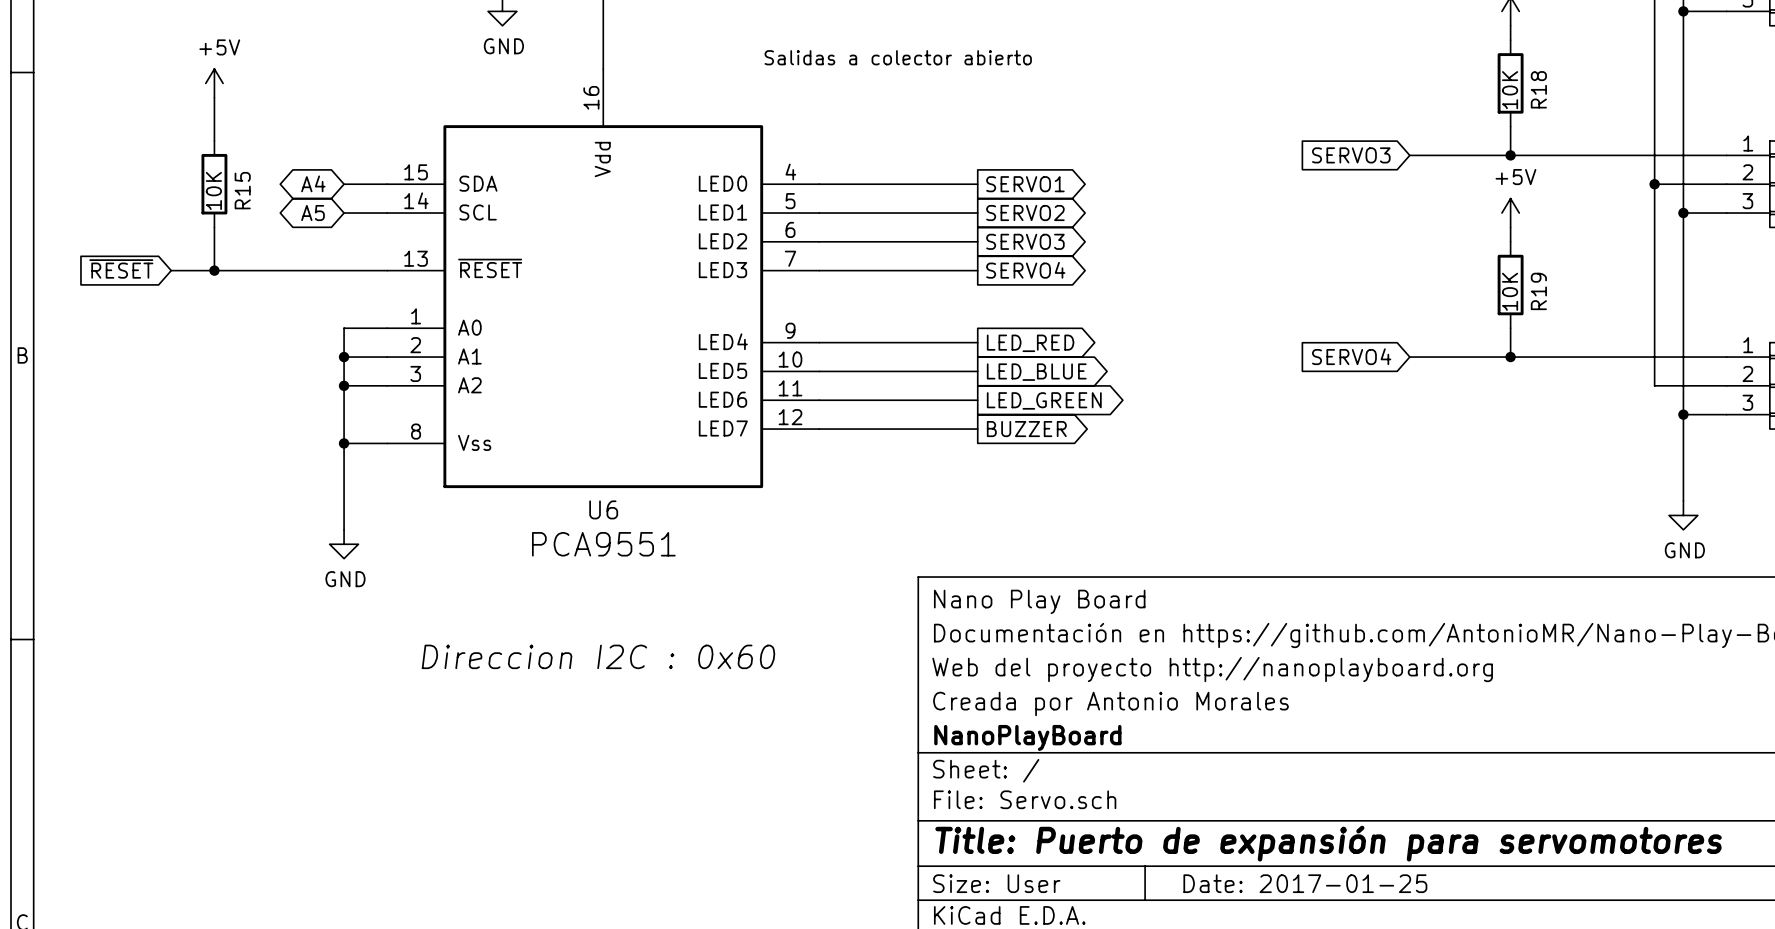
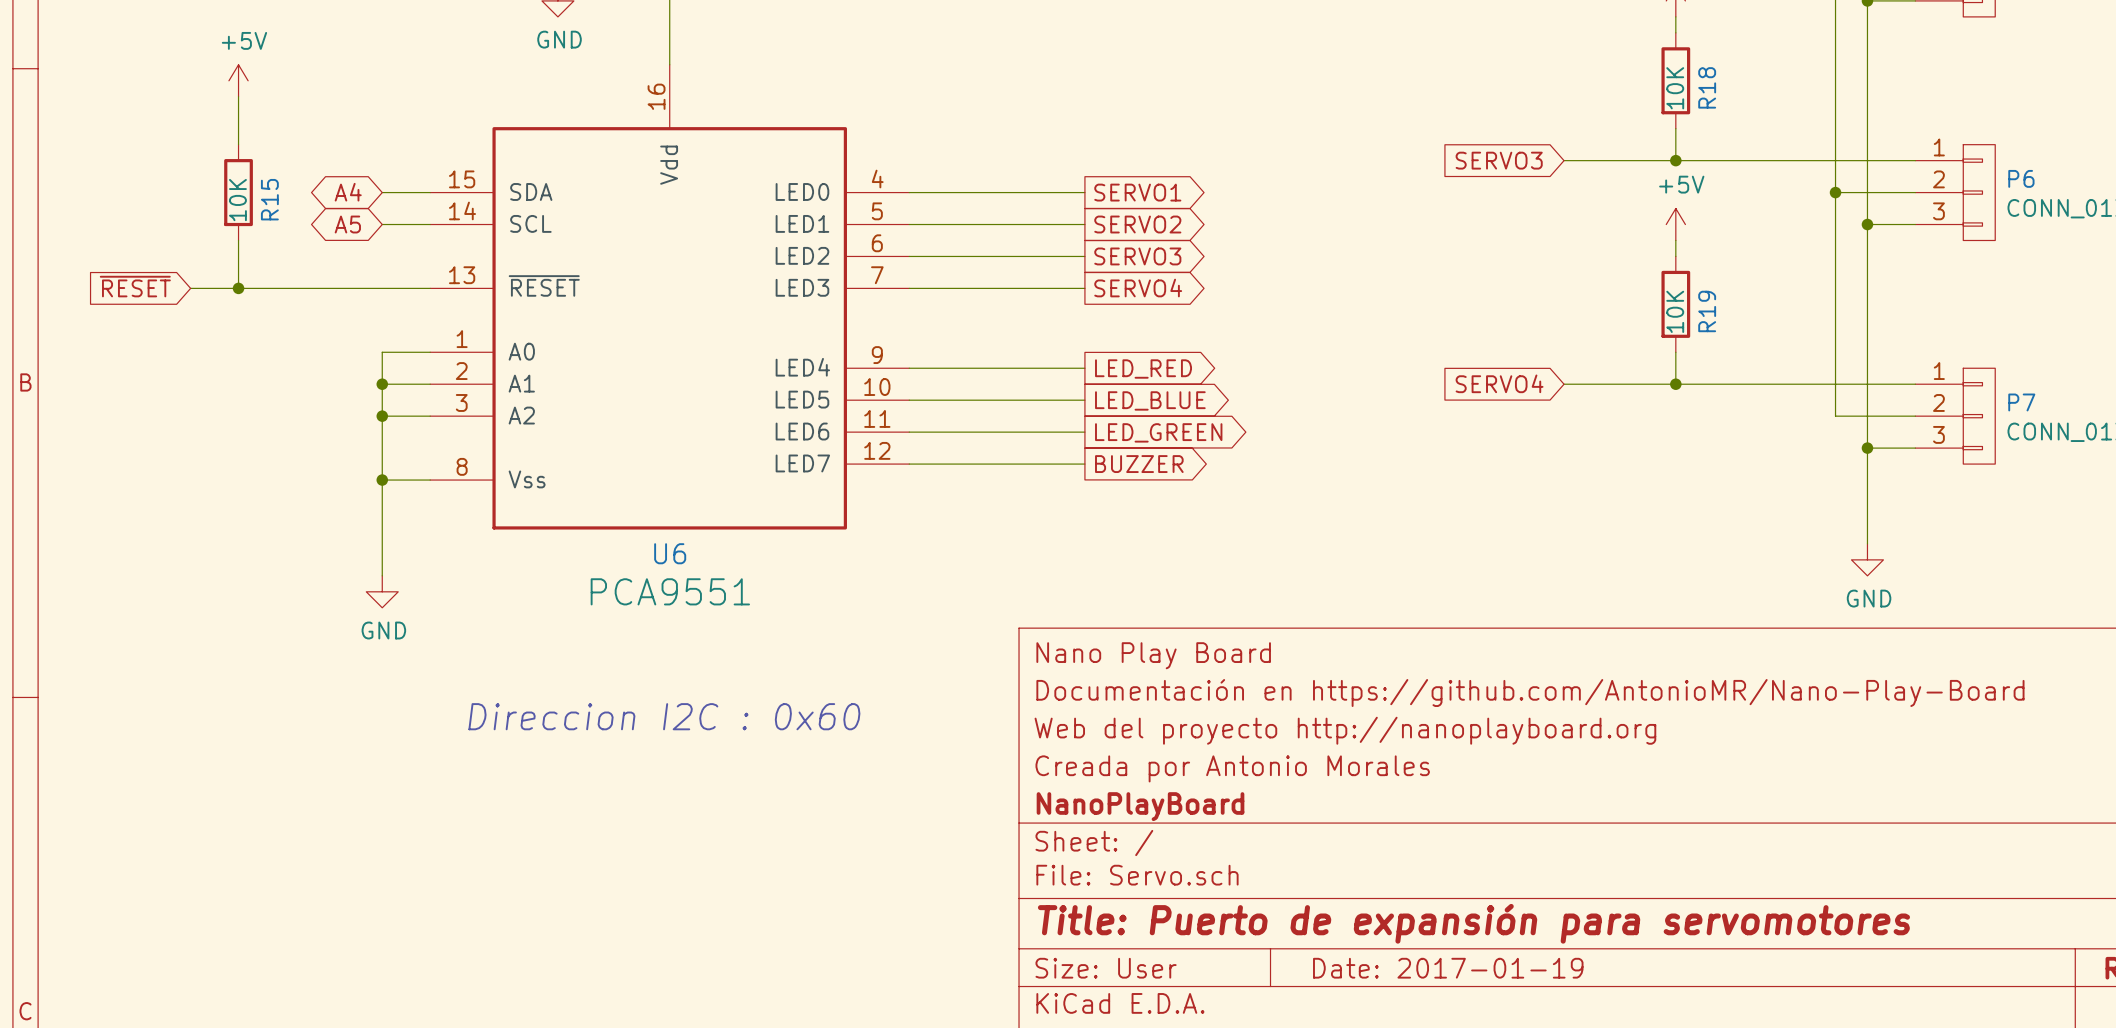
text: Salidas a colector abierto (898, 57) -> none
title block: Date: 2017-01-25 (1305, 883) -> Date: 2017-01-19 (1448, 968)

